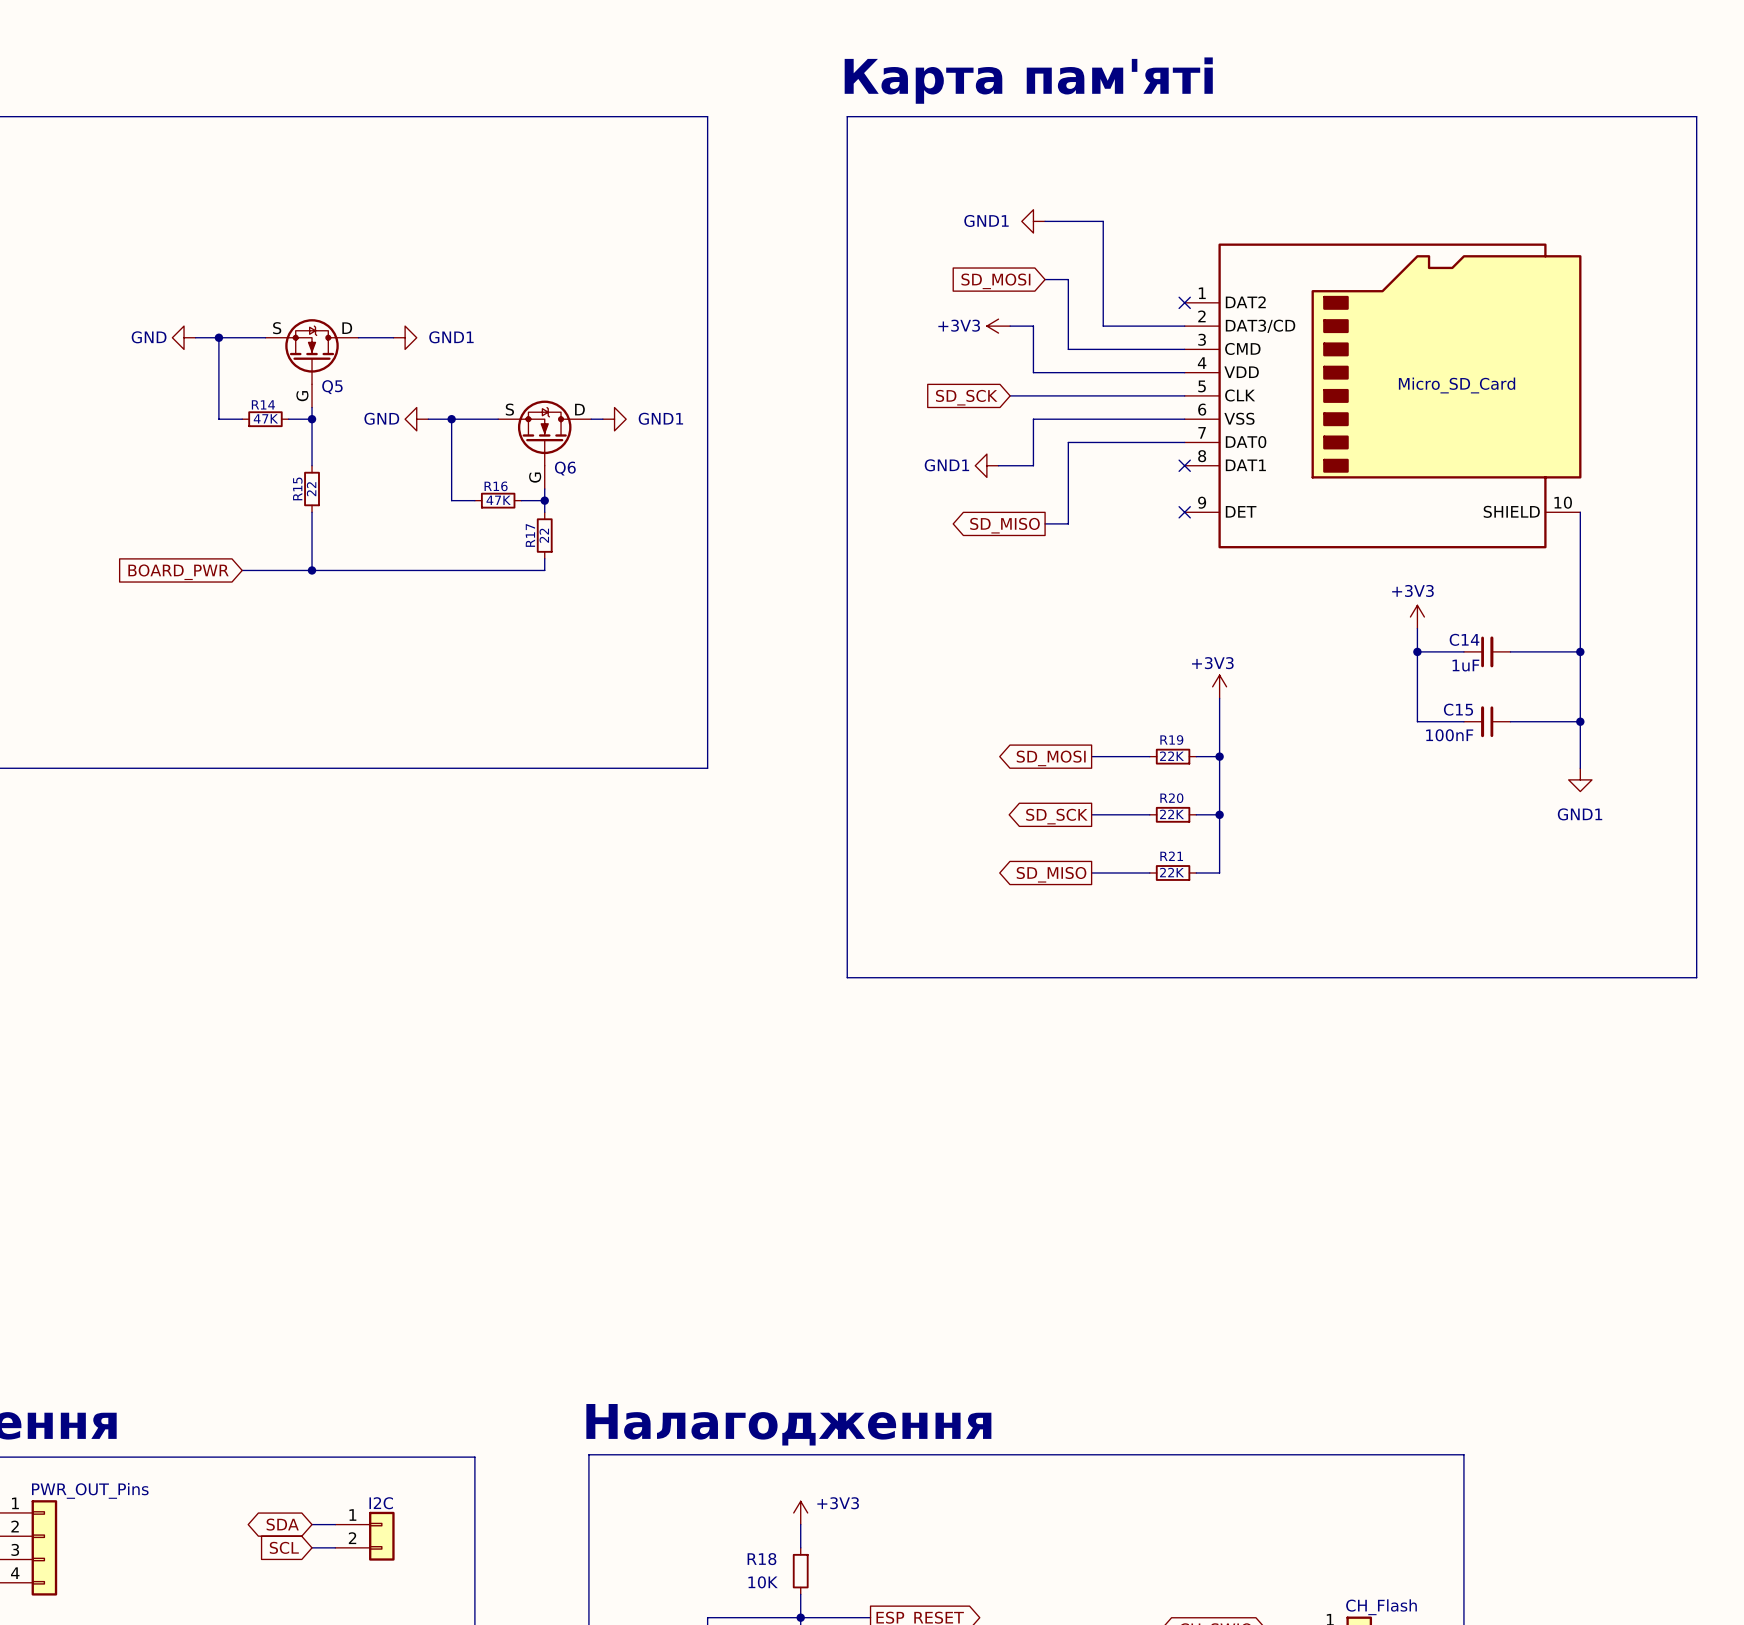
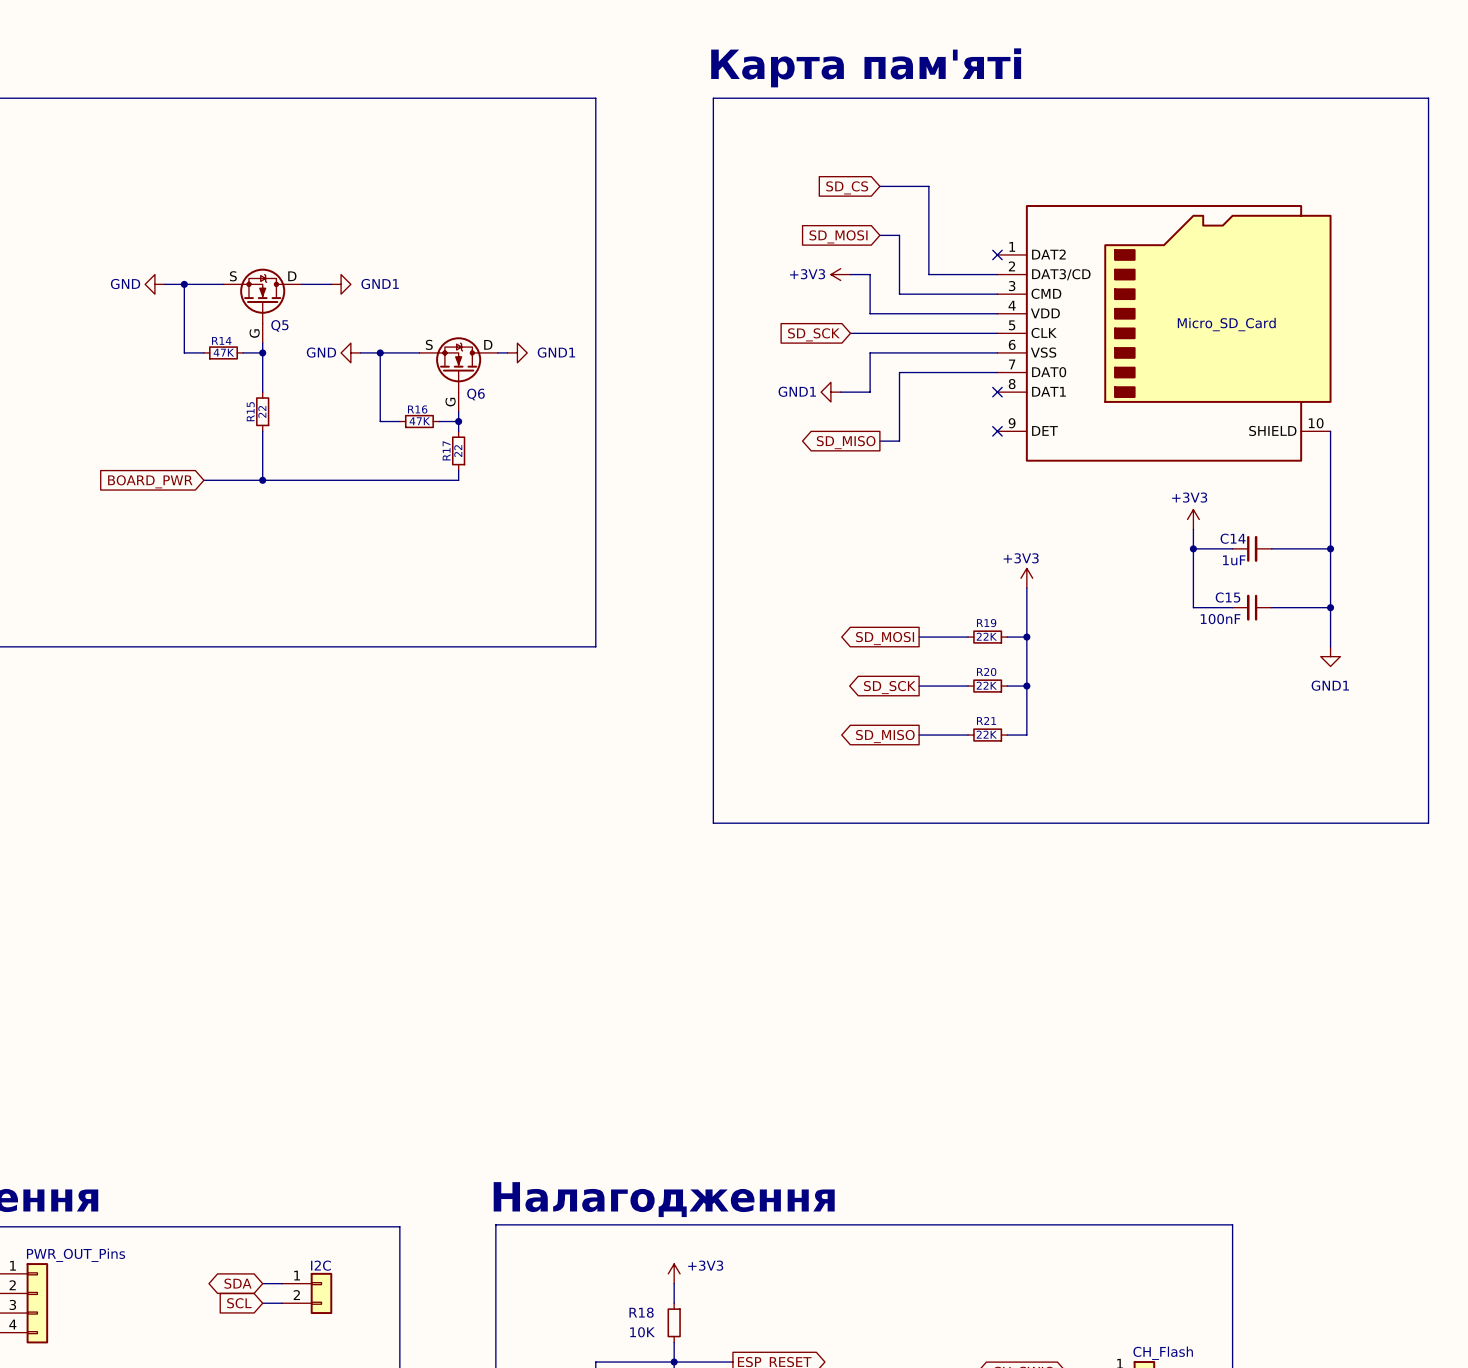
power symbol: GND1 (1033, 221) -> none
global label: none -> SD_CS (847, 187)

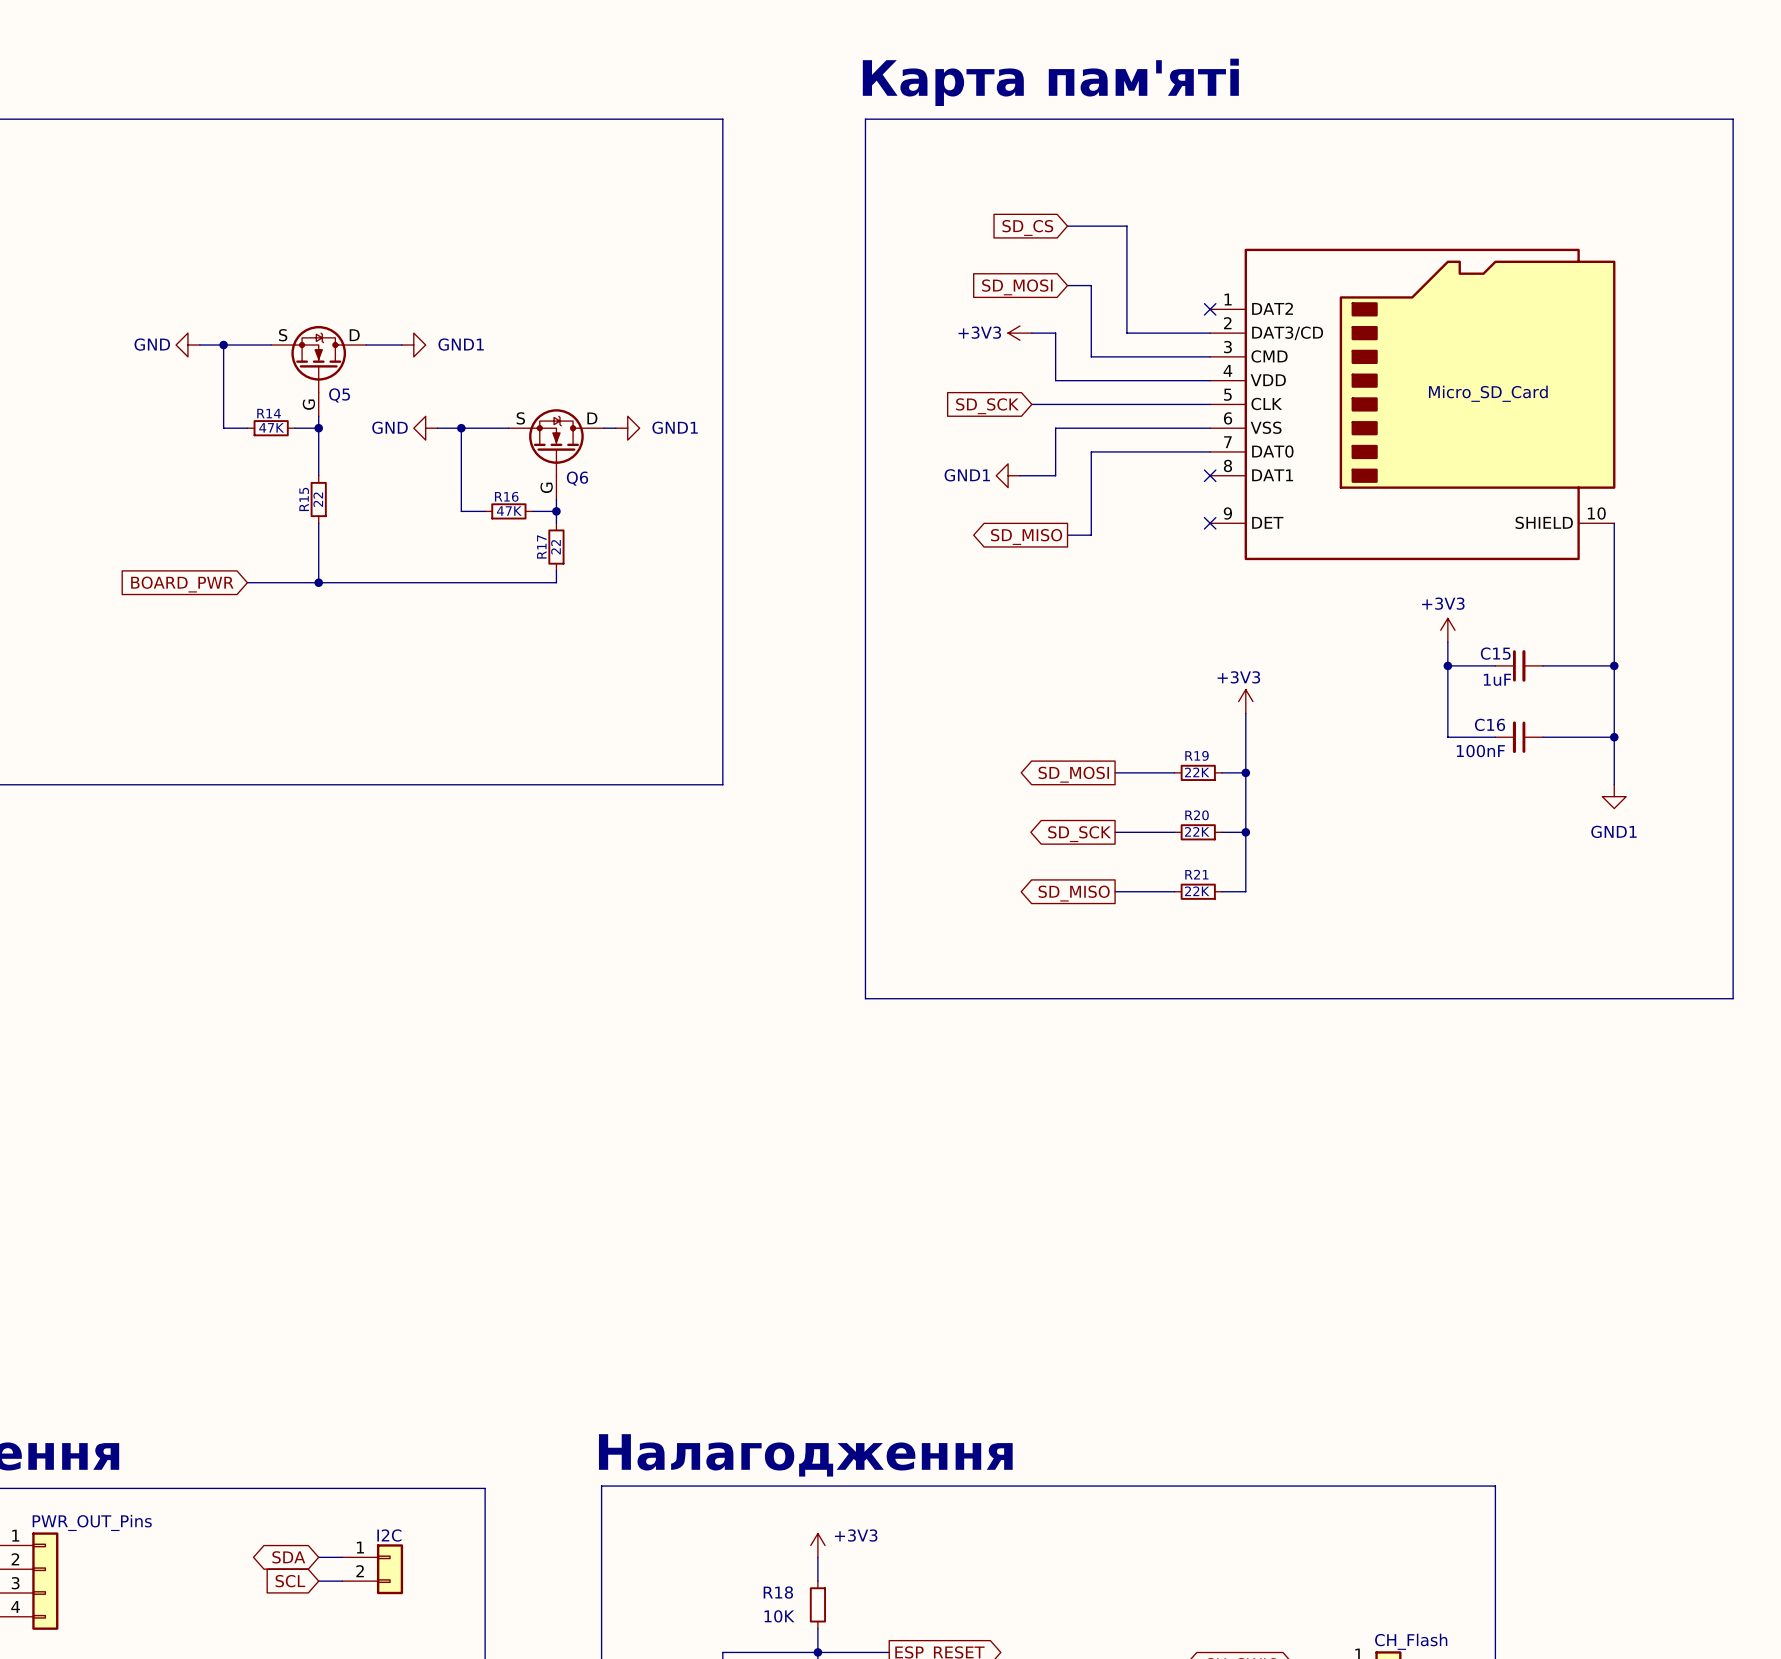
C14 name: C14 (1233, 538) -> C15 (1495, 653)
C15 name: C15 (1227, 597) -> C16 (1490, 724)

